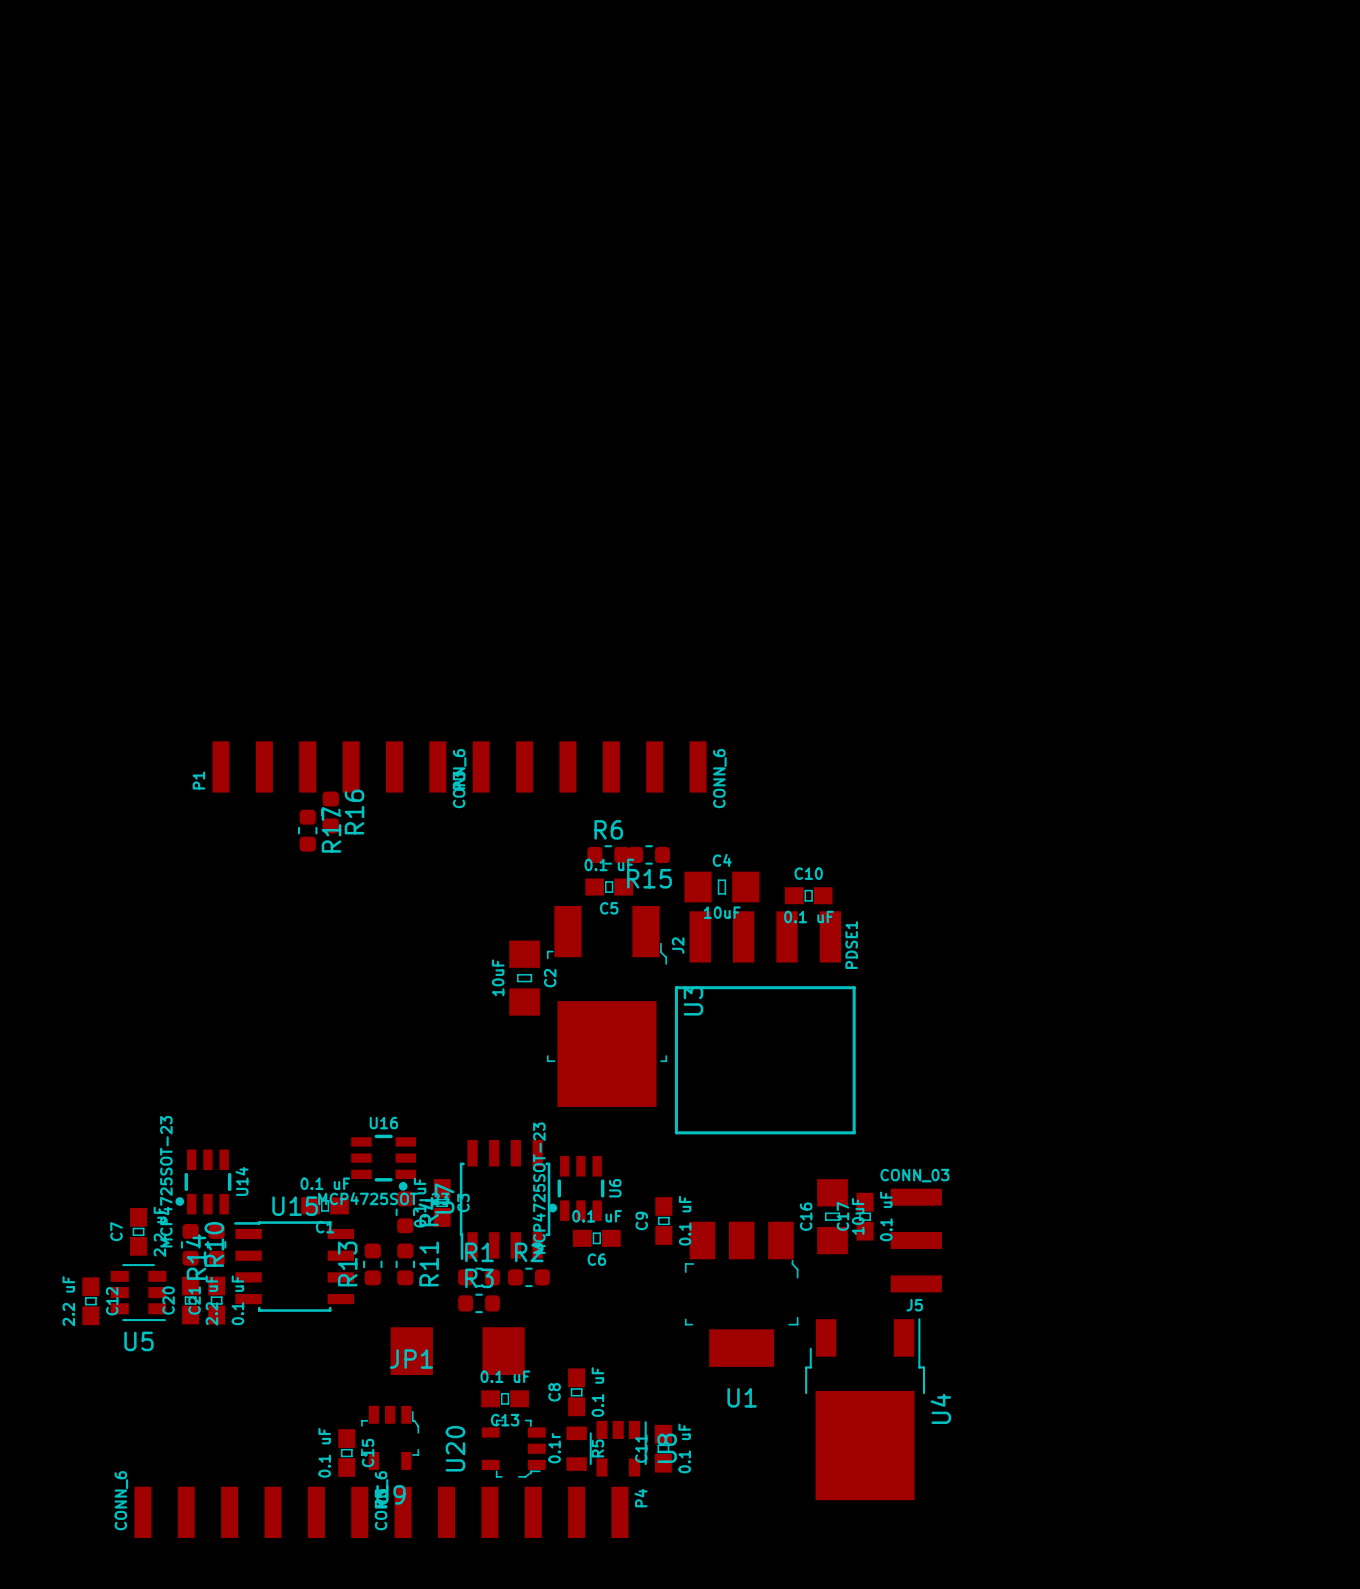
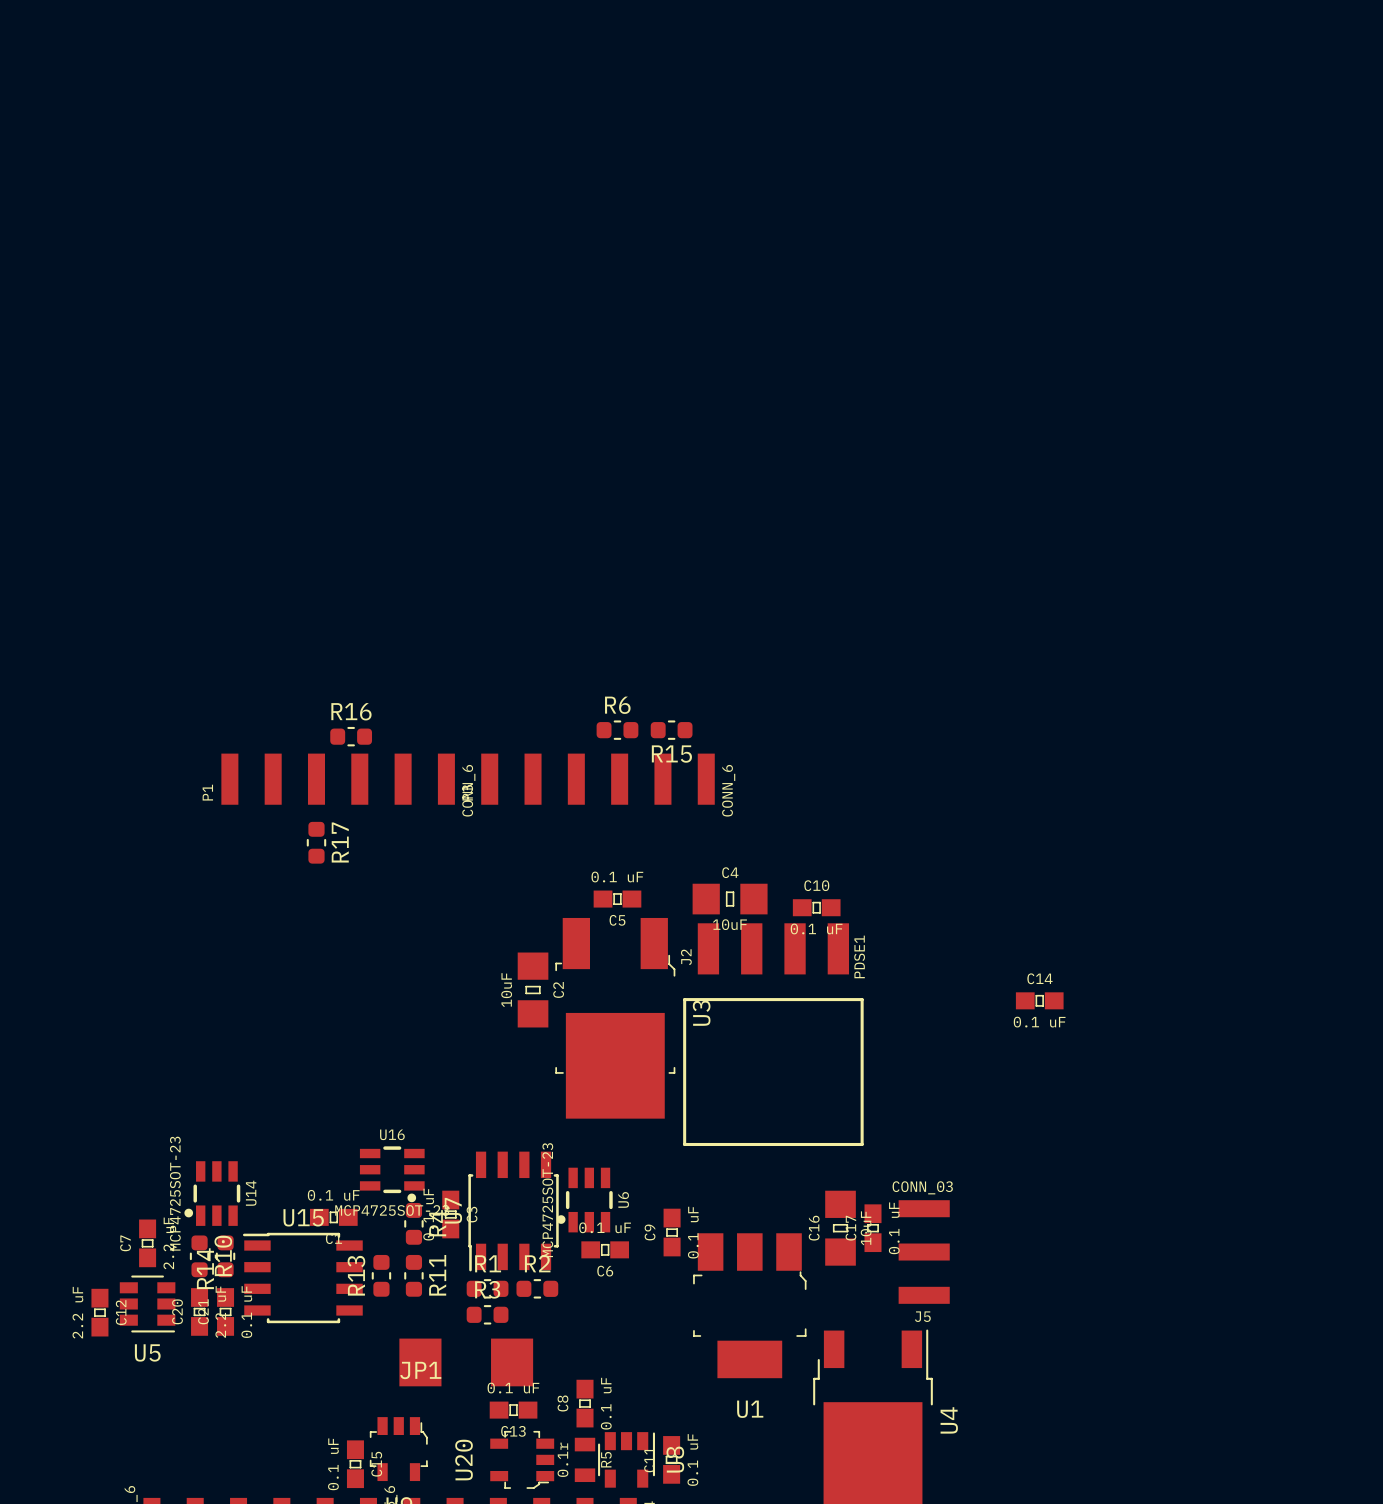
R16 rotation: 0° (330, 812) -> 90° clockwise (351, 736)
R16 position: (330, 812) -> (351, 736)
R16 name position: R16 (354, 812) -> R16 (351, 711)
R6 position: (608, 854) -> (617, 730)
R15 position: (649, 854) -> (671, 730)
C14: none -> 0.1 uF (1039, 1000)

